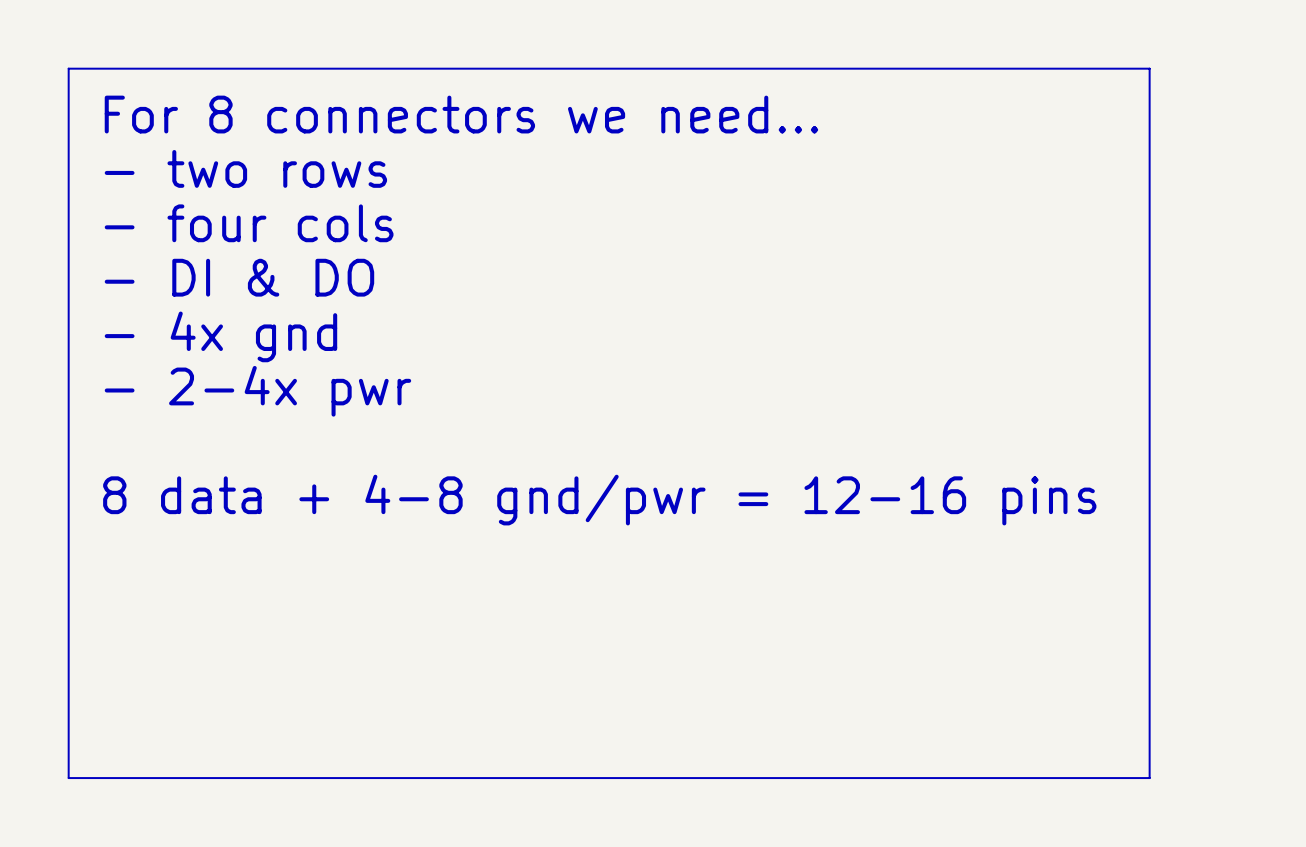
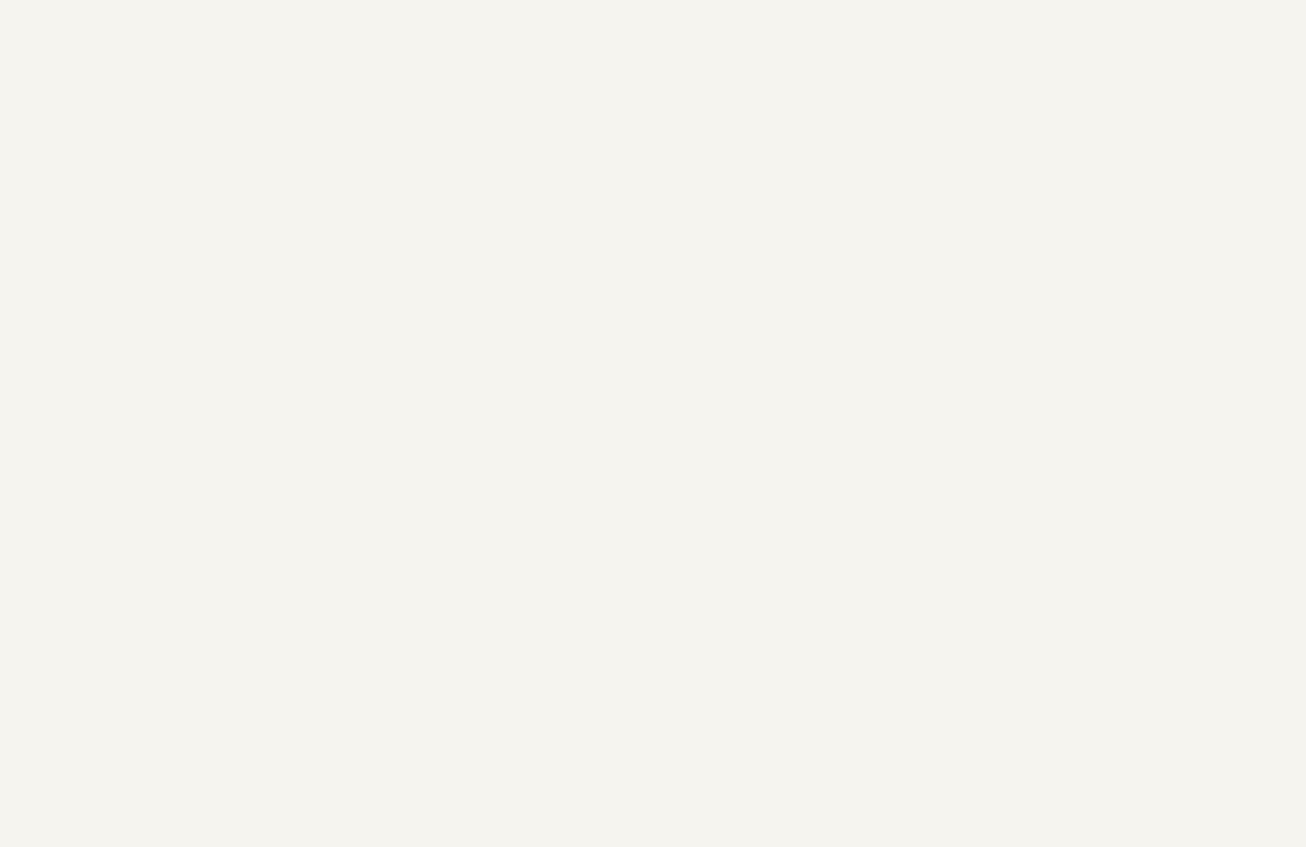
line: (68, 68) (1149, 68) (1149, 778) (68, 778) (68, 68) -> none
text: For 8 connectors we need... (461, 114) -> none
text: - two rows (245, 168) -> none
text: - four cols (249, 223) -> none
text: - DI & DO (239, 277) -> none
text: - 4x gnd (220, 336) -> none
text: - 2-4x pwr (257, 391) -> none
text: 8 data + 4-8 gnd/pwr = 12-16 pins (599, 500) -> none

